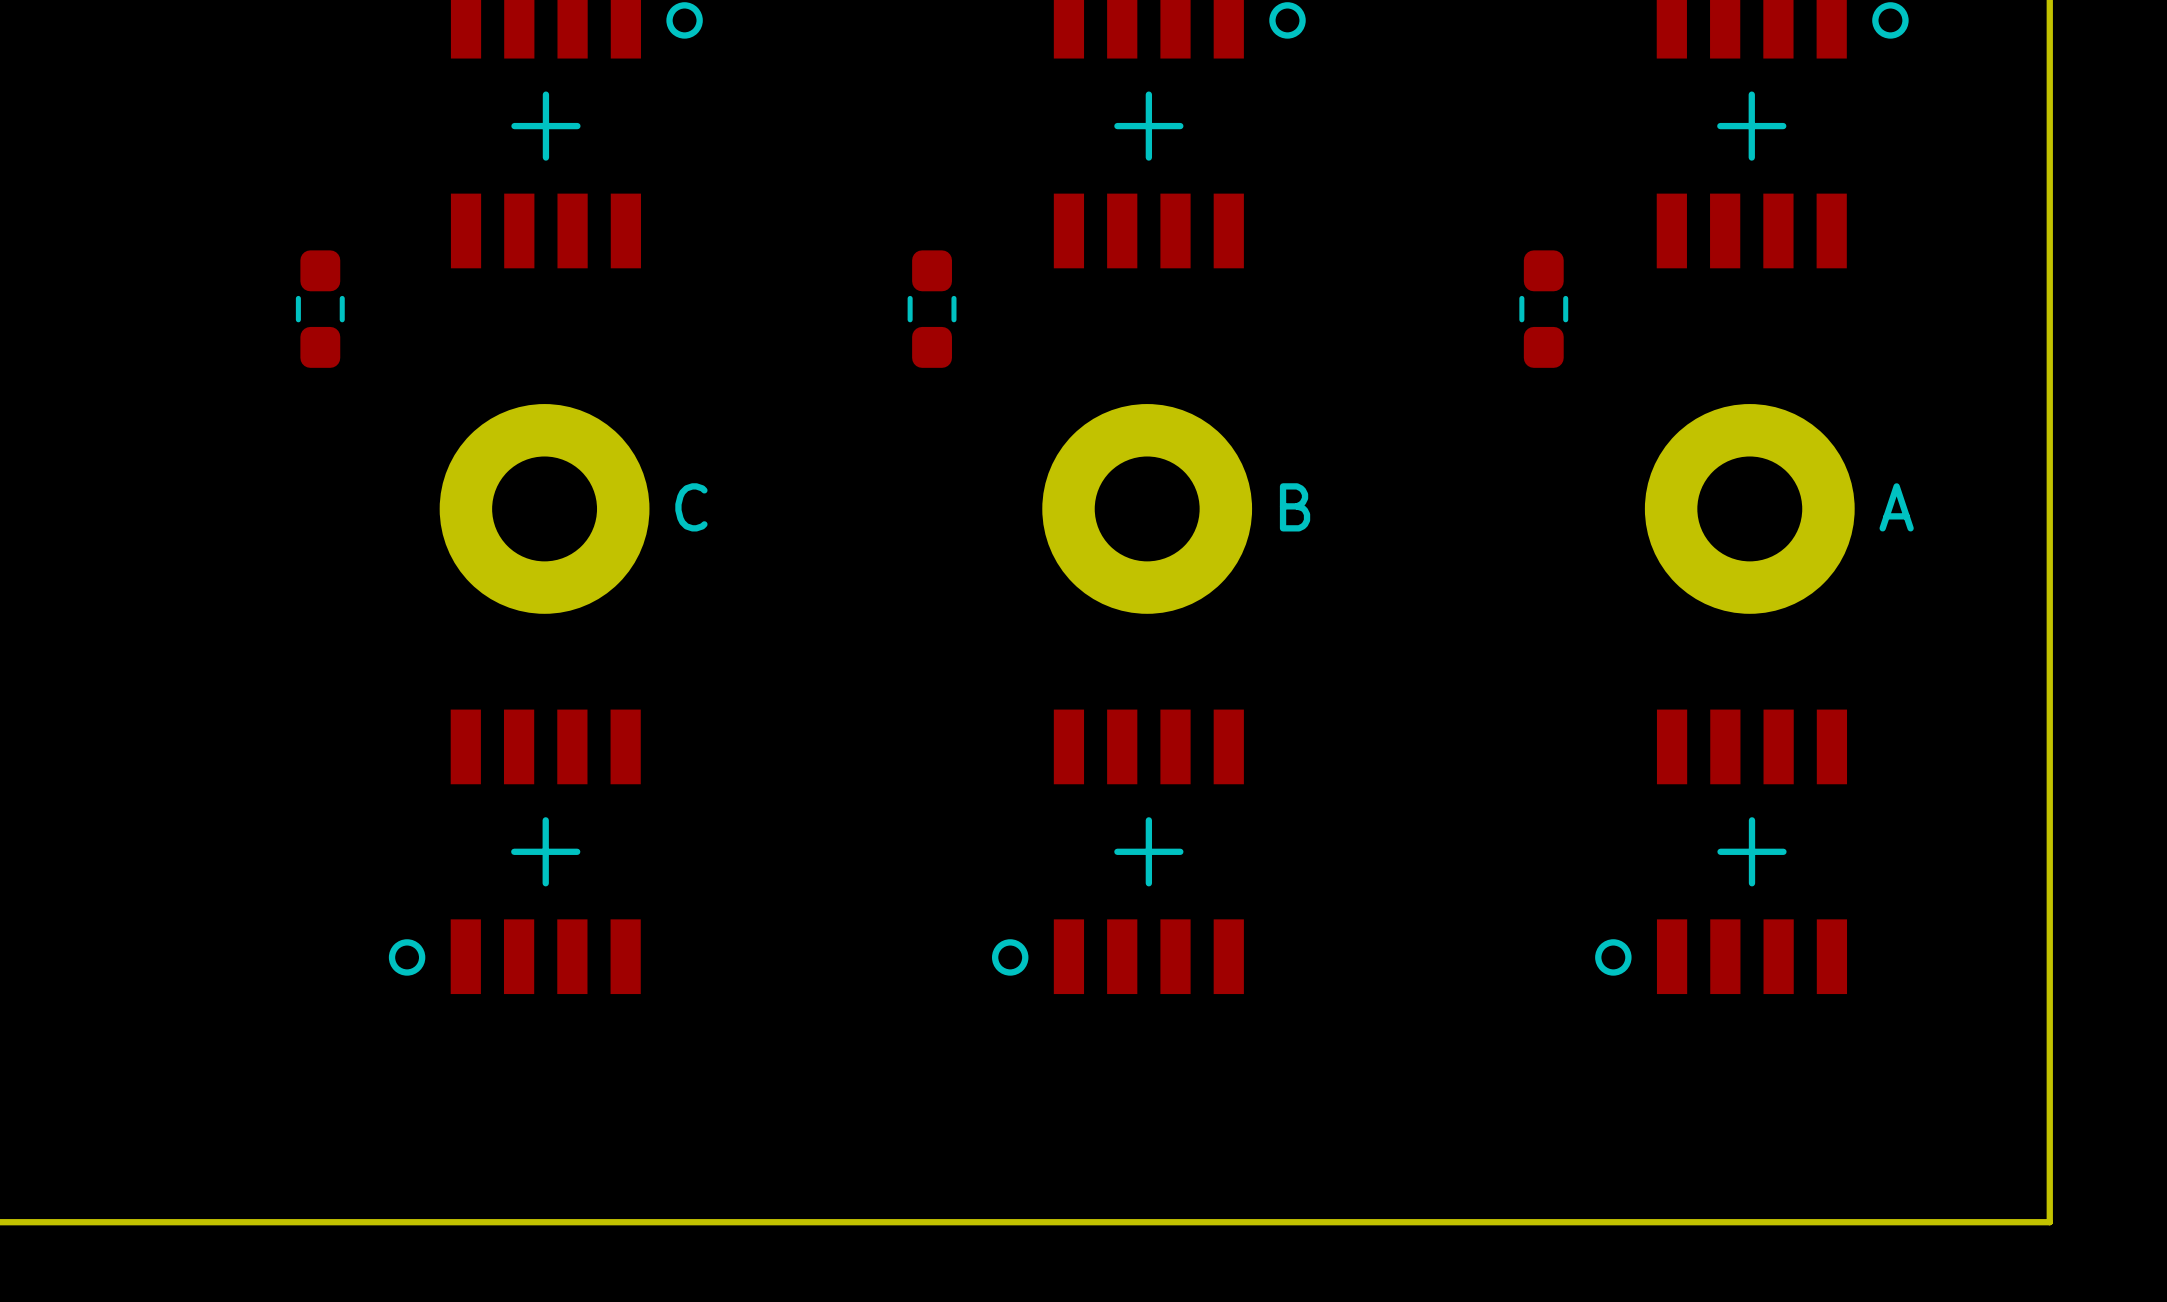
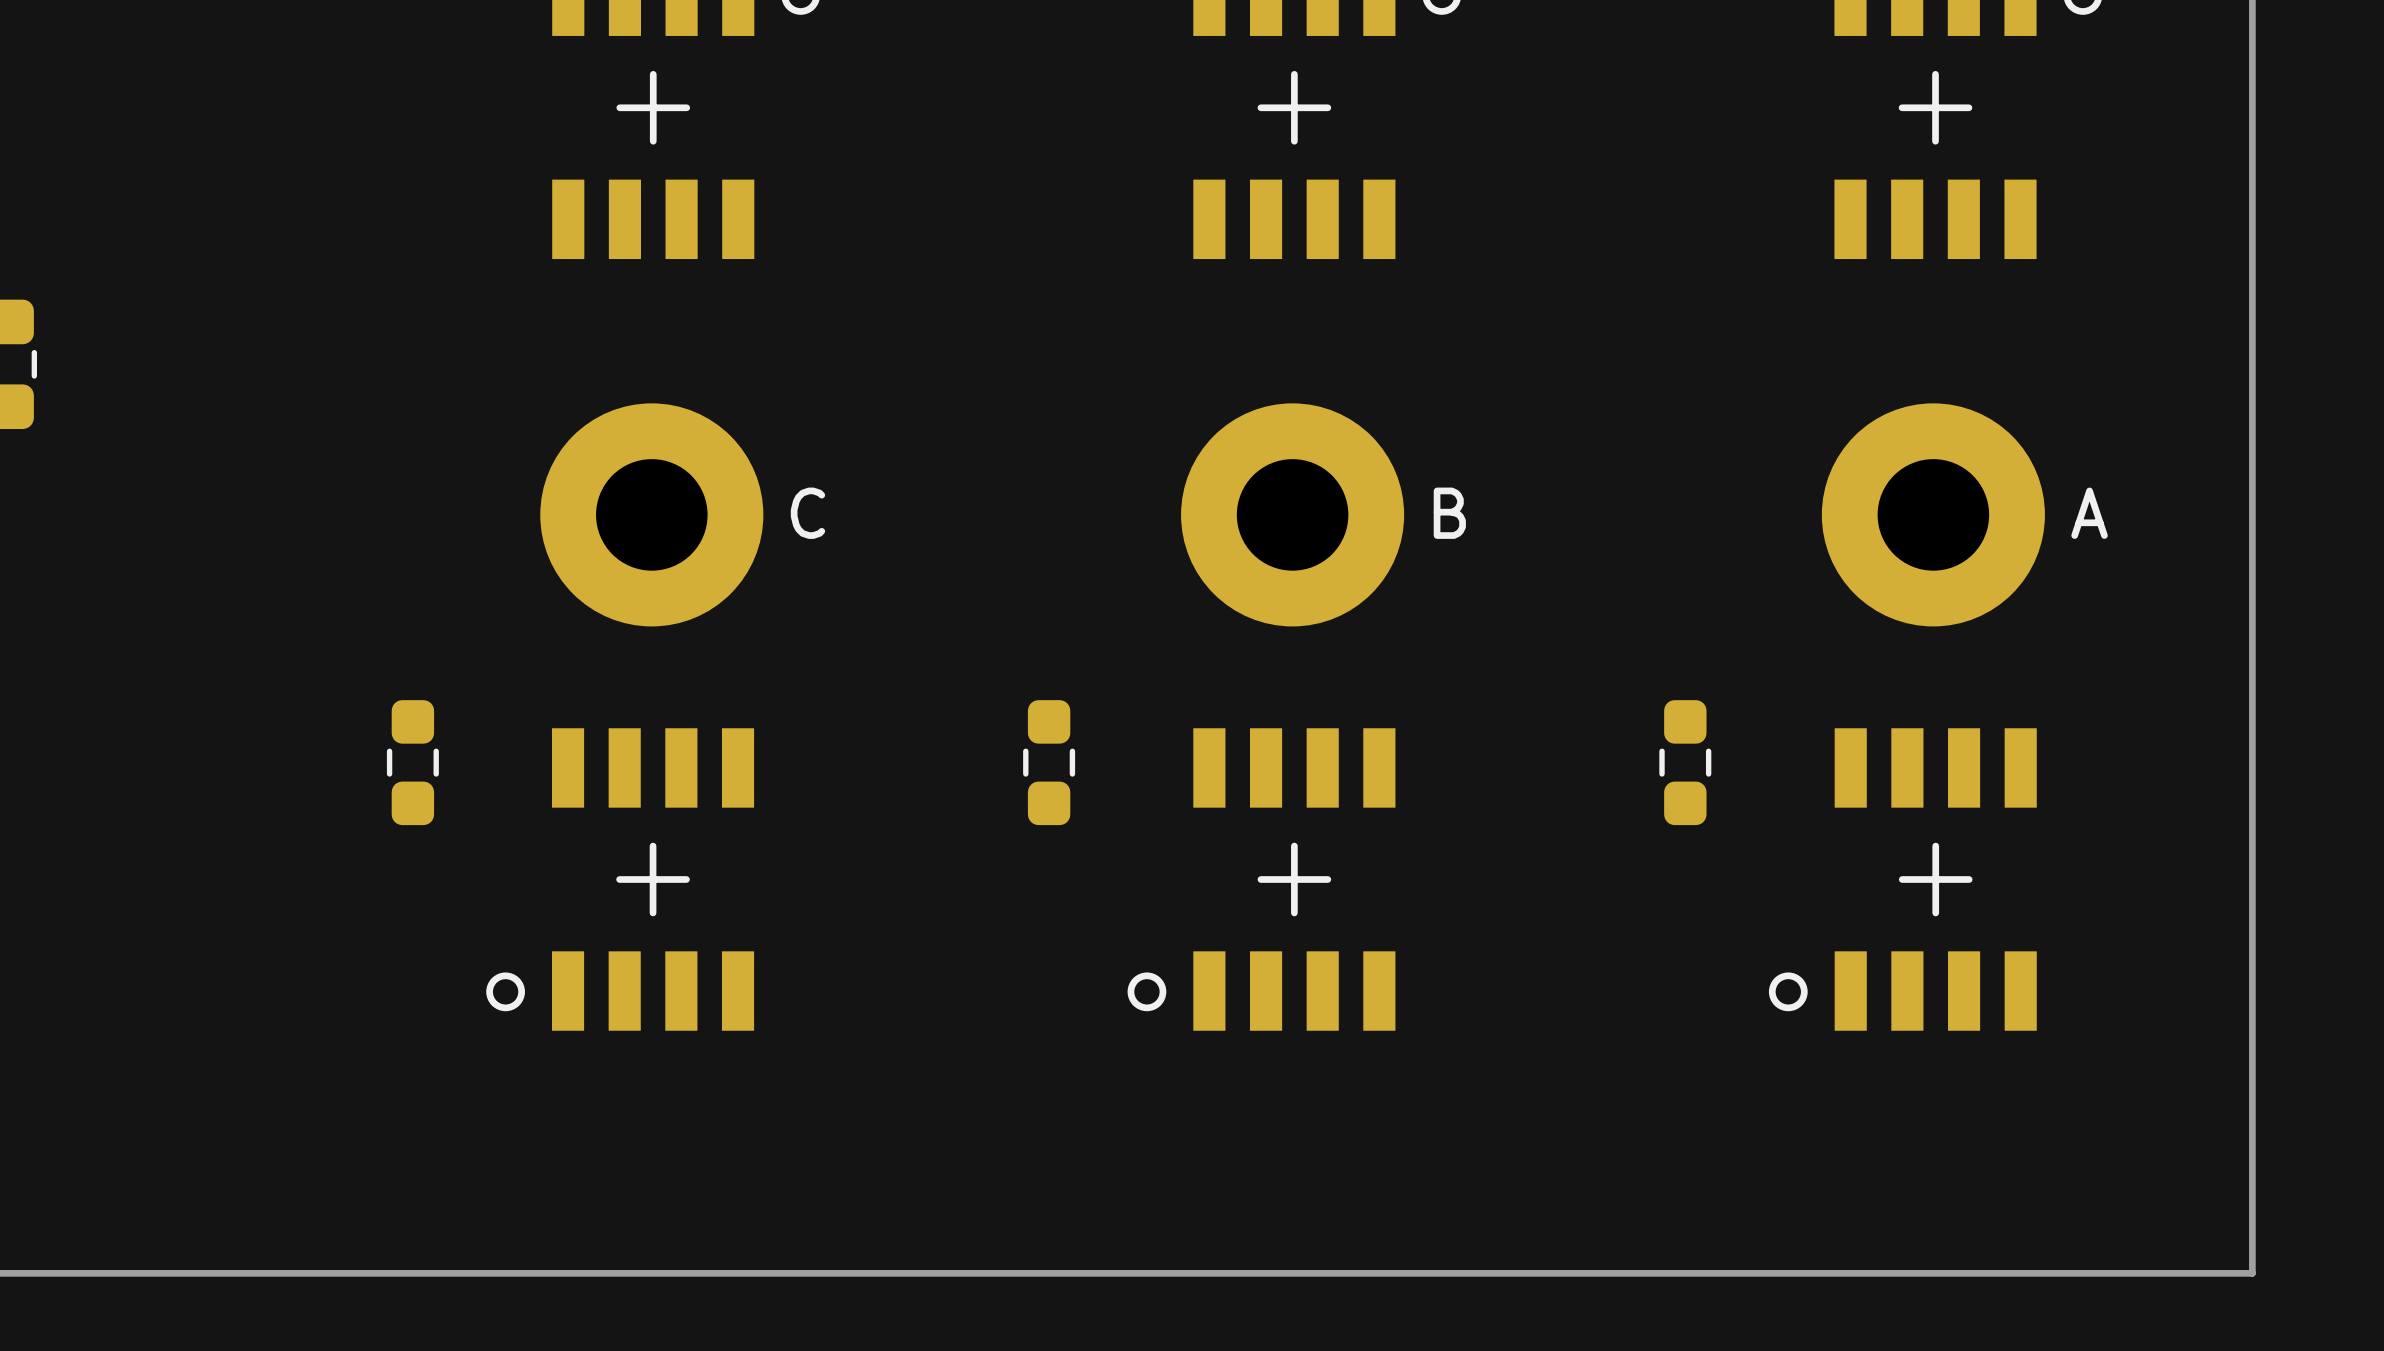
part: (320, 309) -> none
part: (932, 309) -> none
part: (1543, 309) -> none
part: none -> (412, 762)
part: none -> (1049, 762)
part: none -> (1685, 762)

